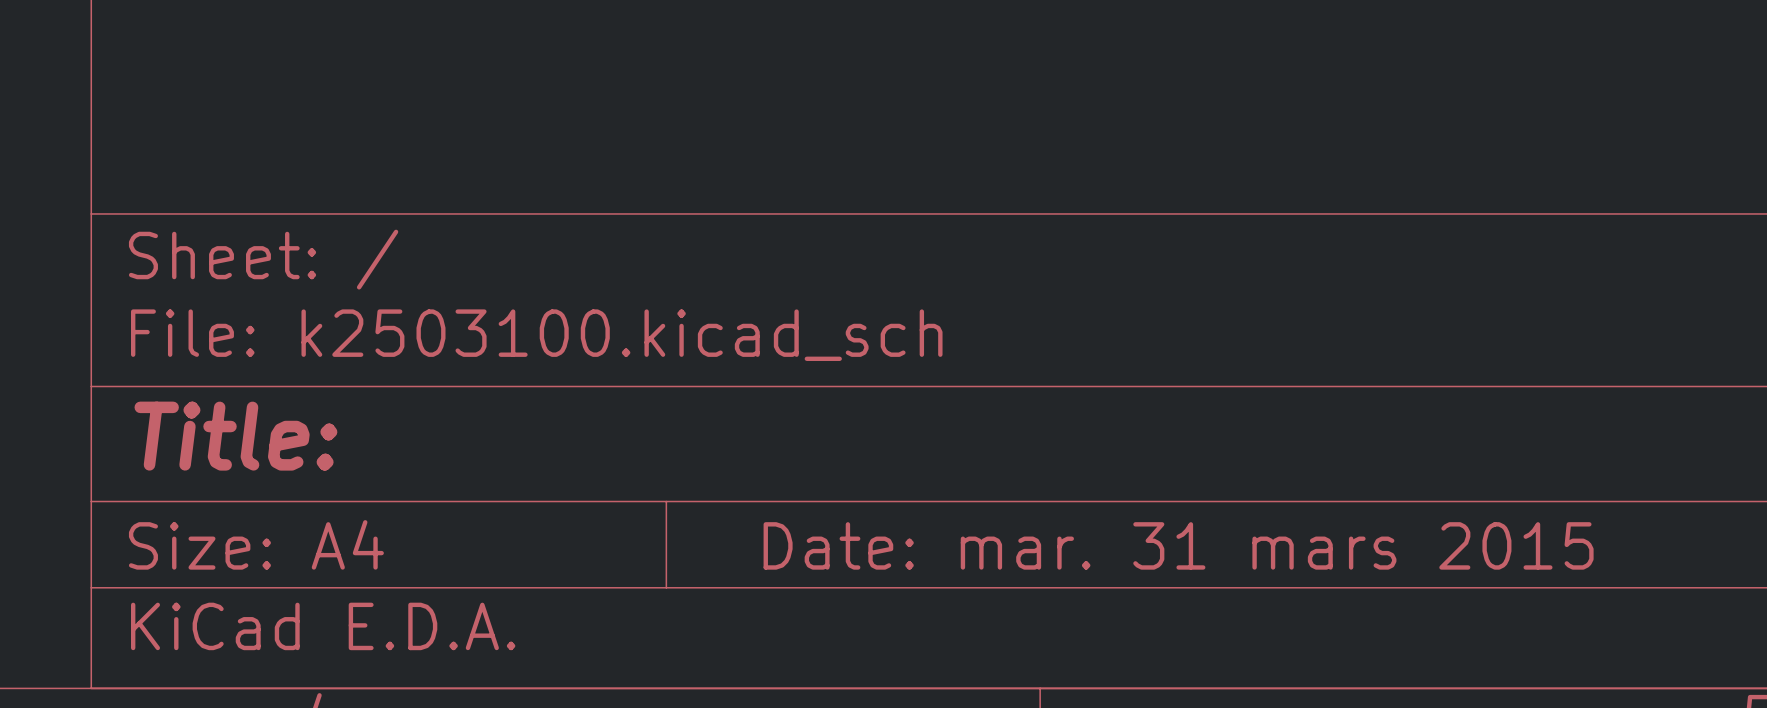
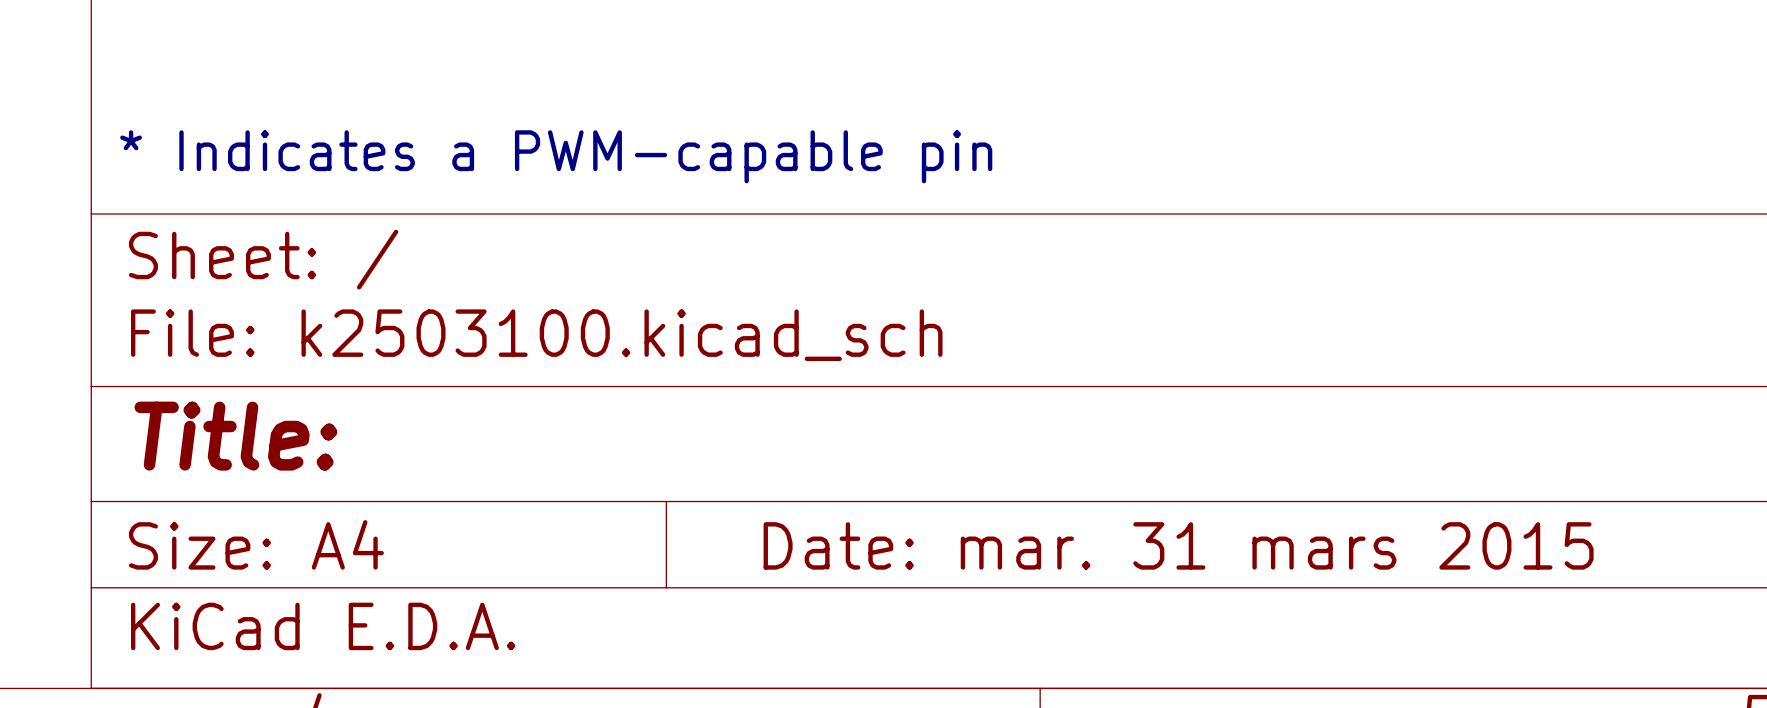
text: none -> * Indicates a PWM-capable pin (556, 156)

